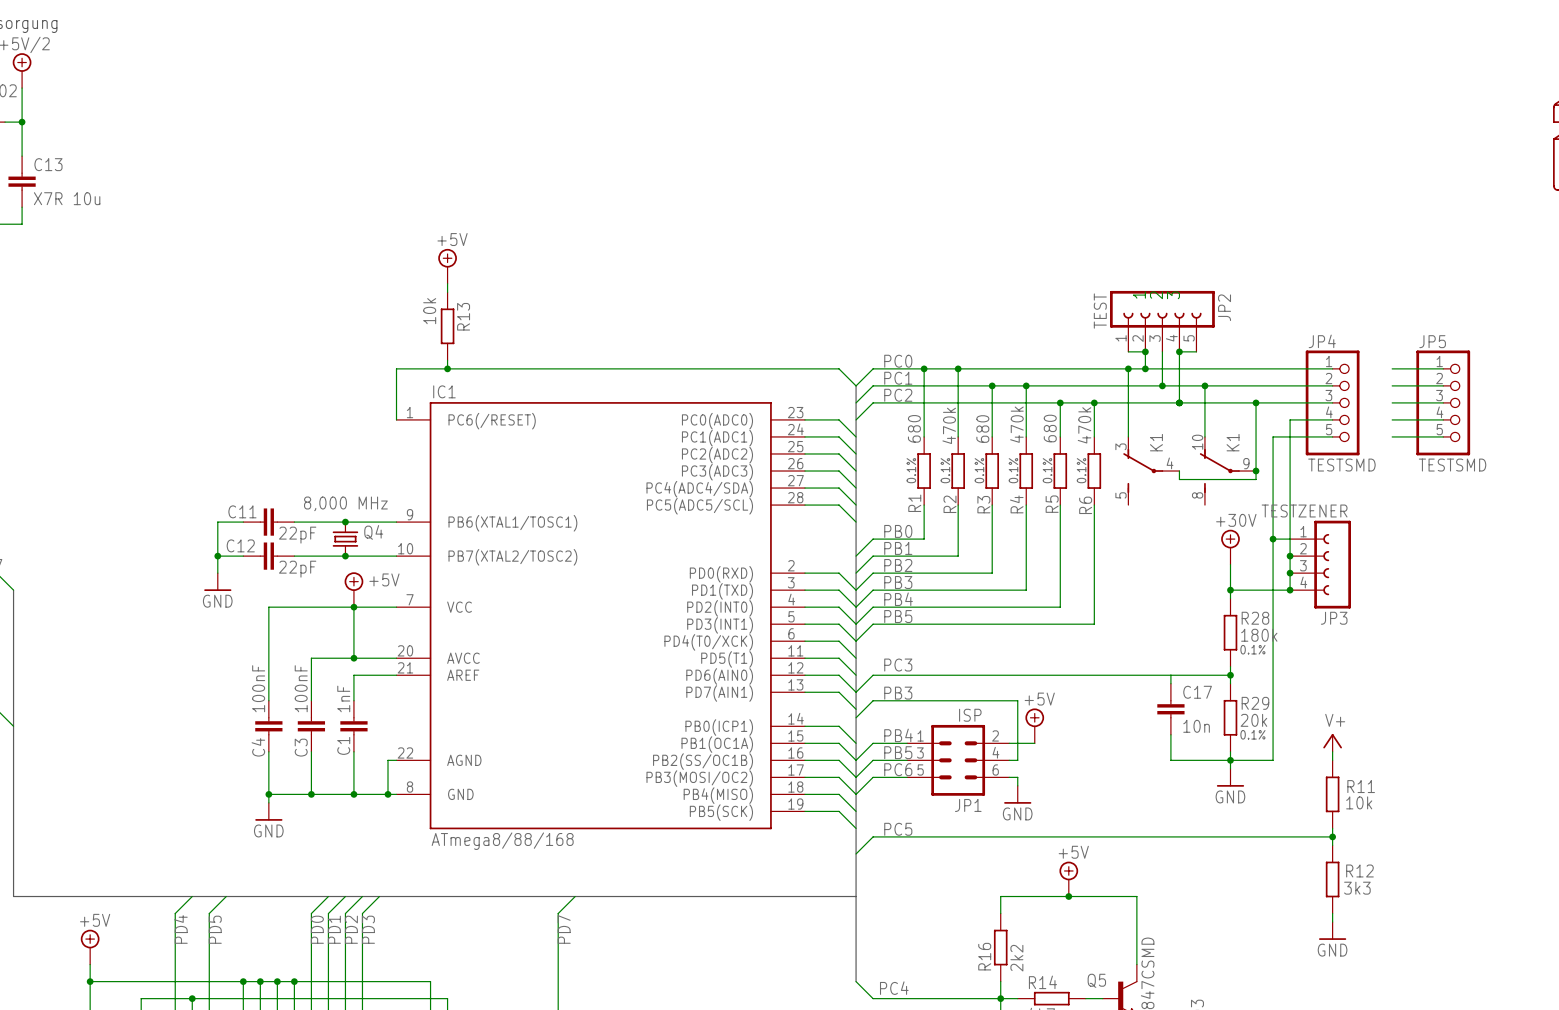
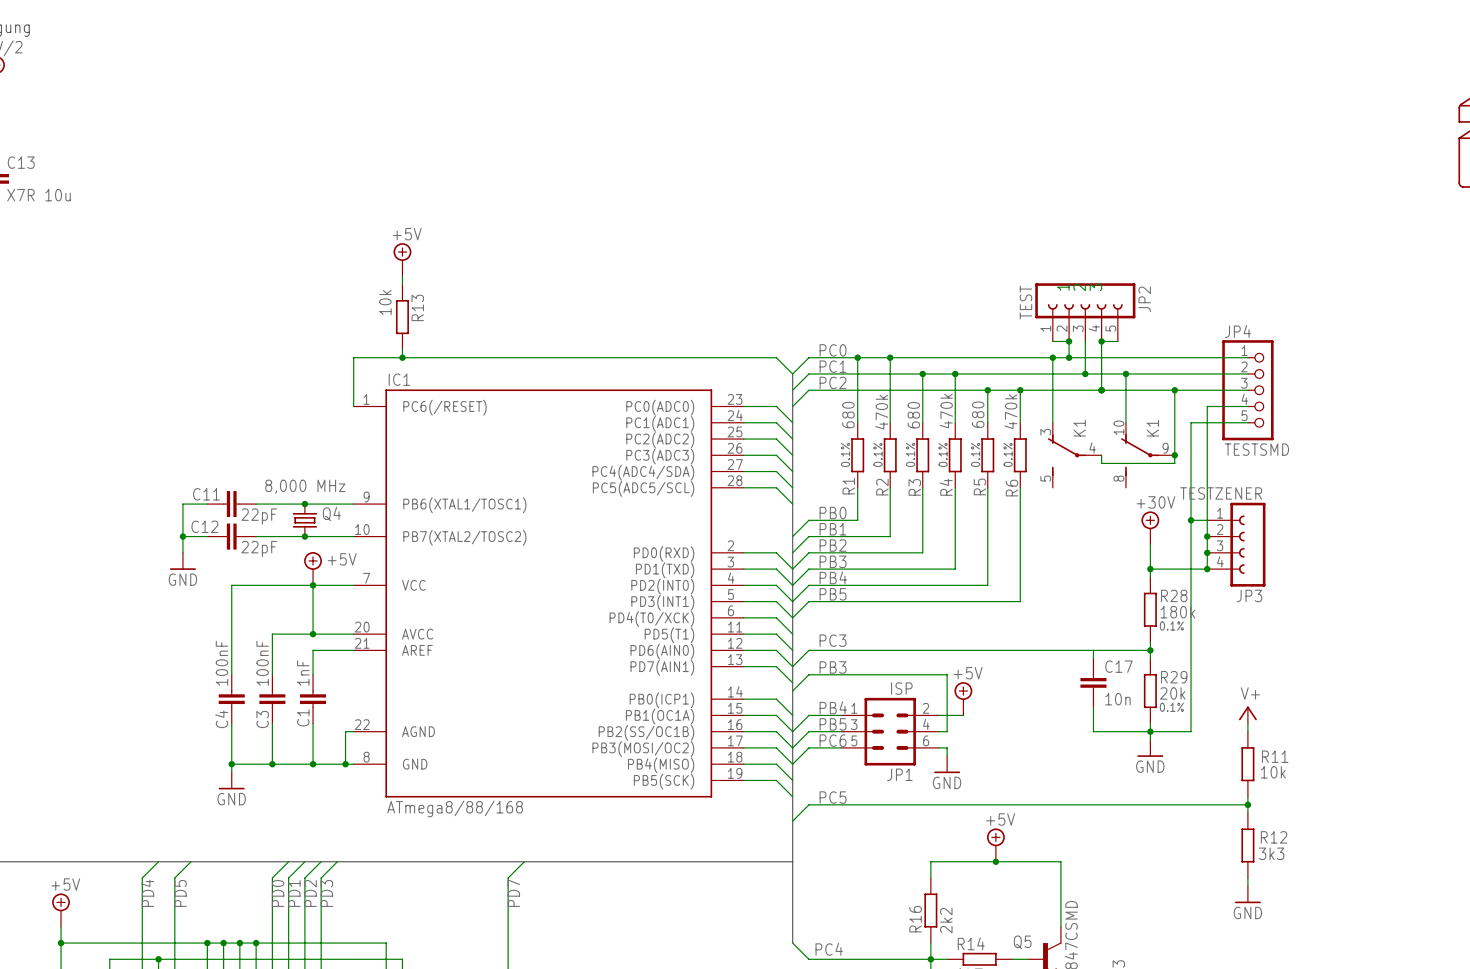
wire: (1392, 368) (1443, 368) -> none
wire: (1392, 385) (1443, 385) -> none
wire: (1392, 402) (1443, 402) -> none
JP5: TESTSMD (1443, 402) -> none
wire: (1392, 419) (1443, 419) -> none
wire: (1392, 436) (1443, 436) -> none

